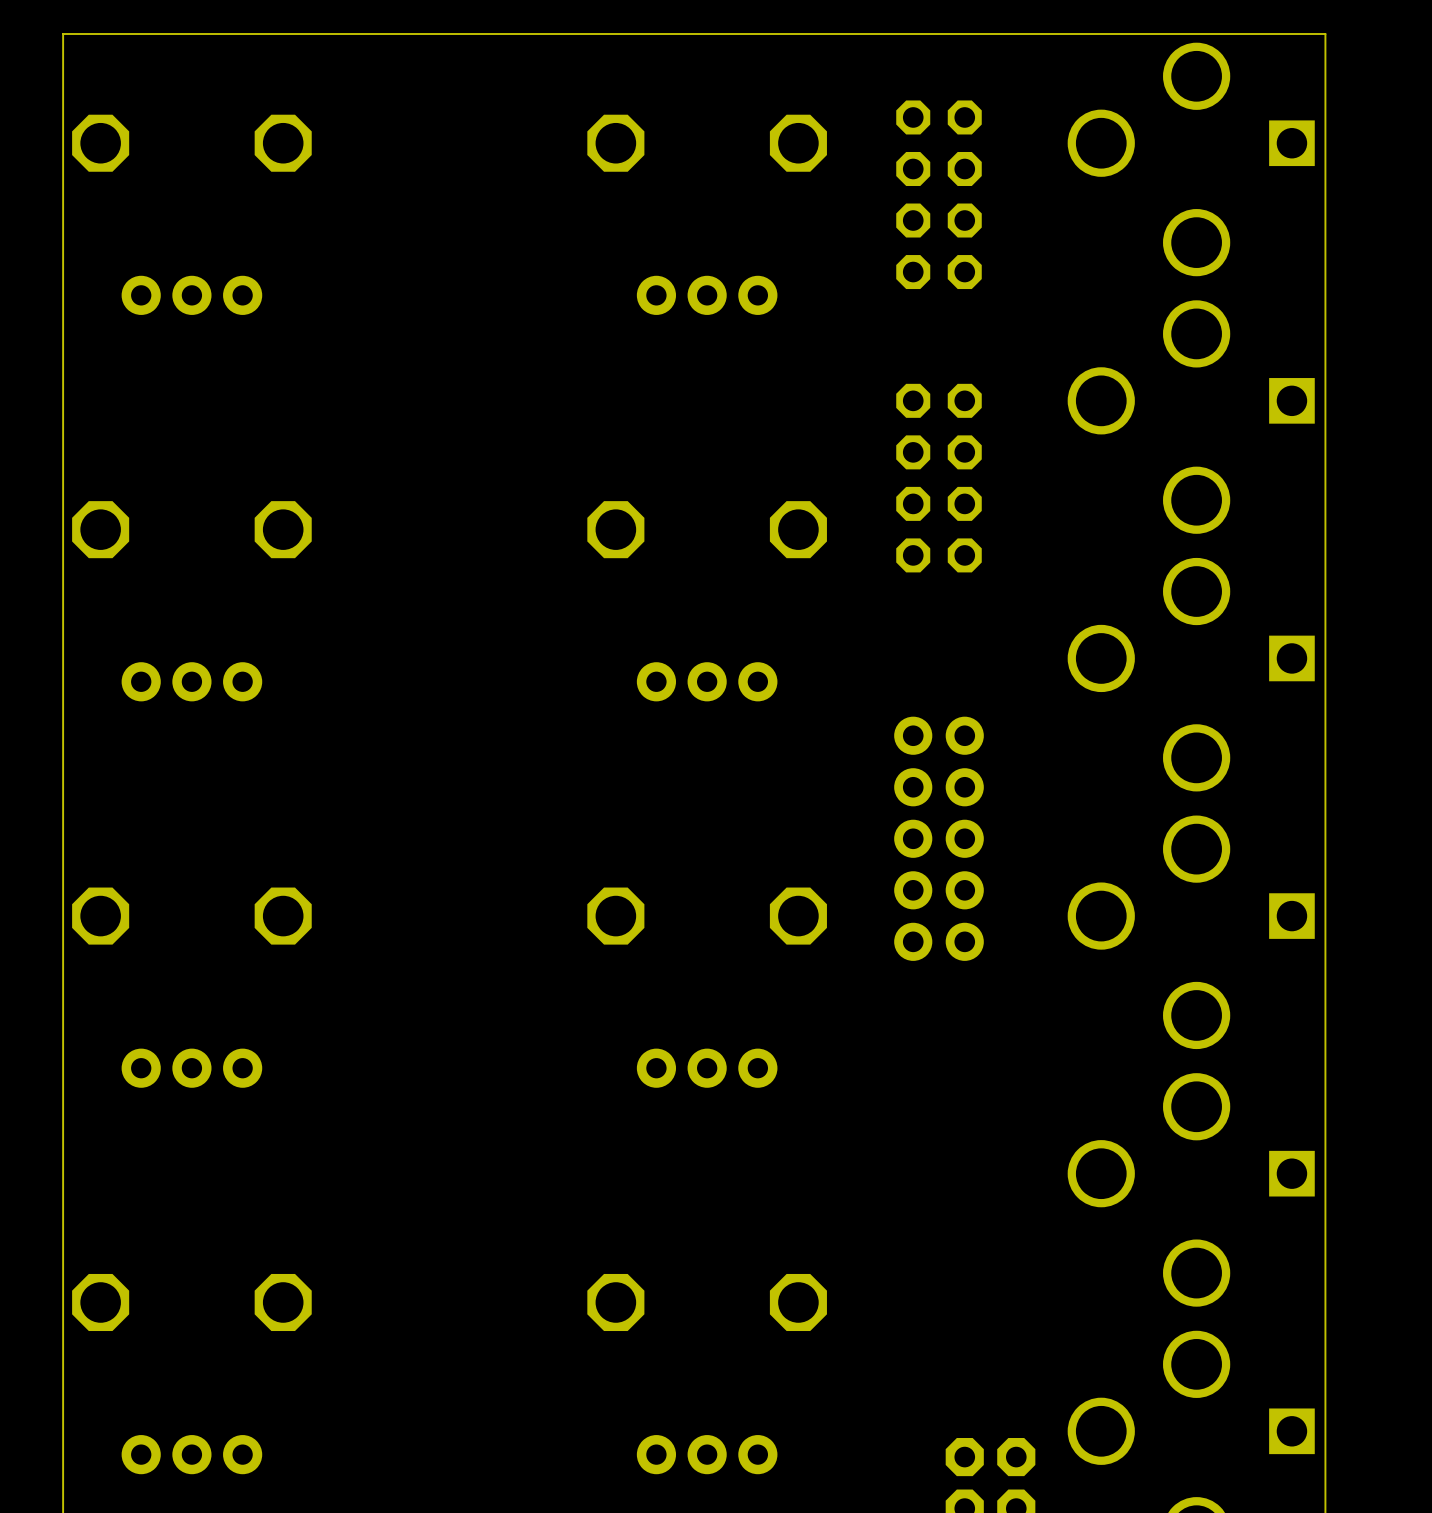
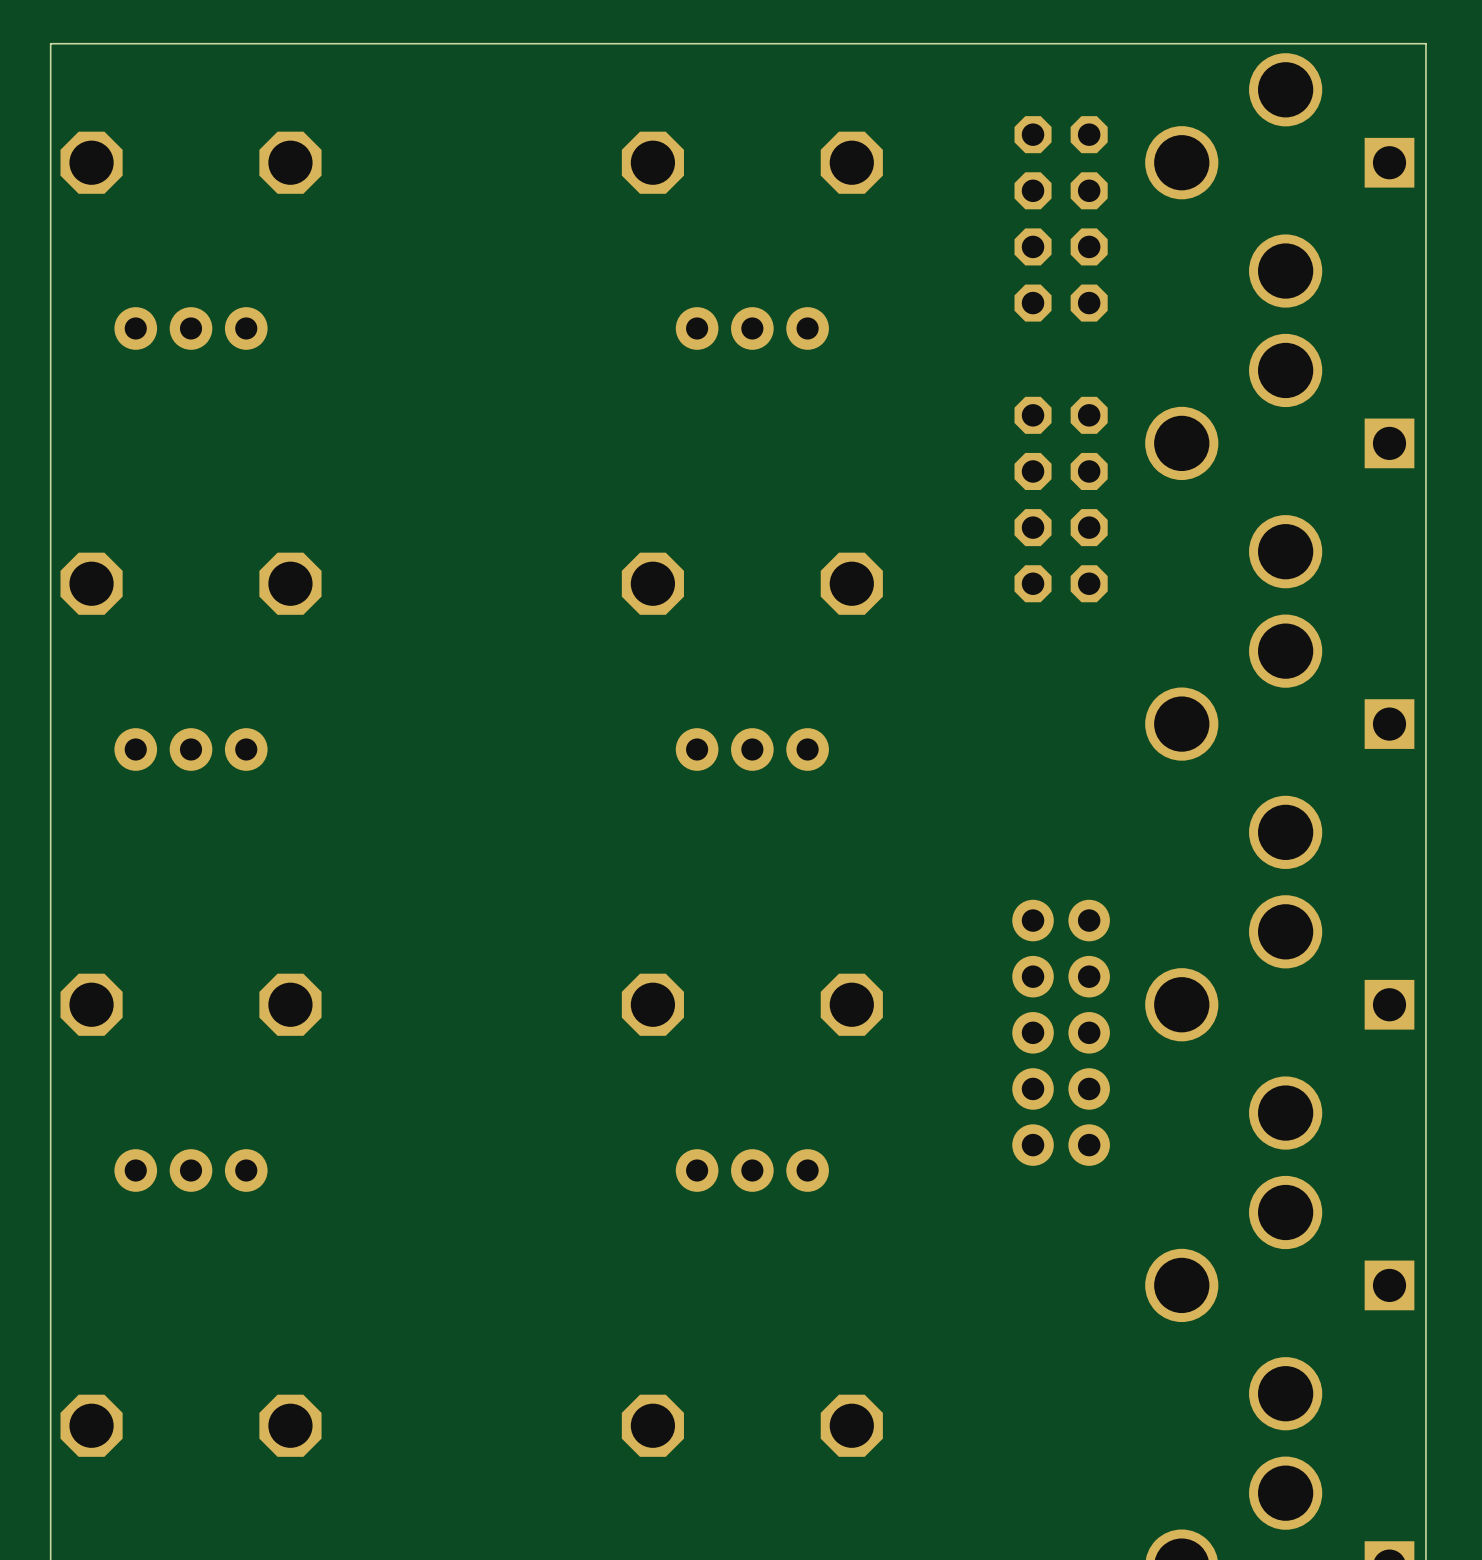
part position: (939, 194) -> (1061, 218)
part position: (939, 478) -> (1061, 499)
part: (913, 761) -> none
part: (964, 761) -> none
part: (939, 838) -> none
part: none -> (1089, 948)
part: (939, 890) -> none
part: (939, 941) -> none
part: none -> (1061, 1032)
part: none -> (1061, 1088)
part: none -> (1061, 1145)

